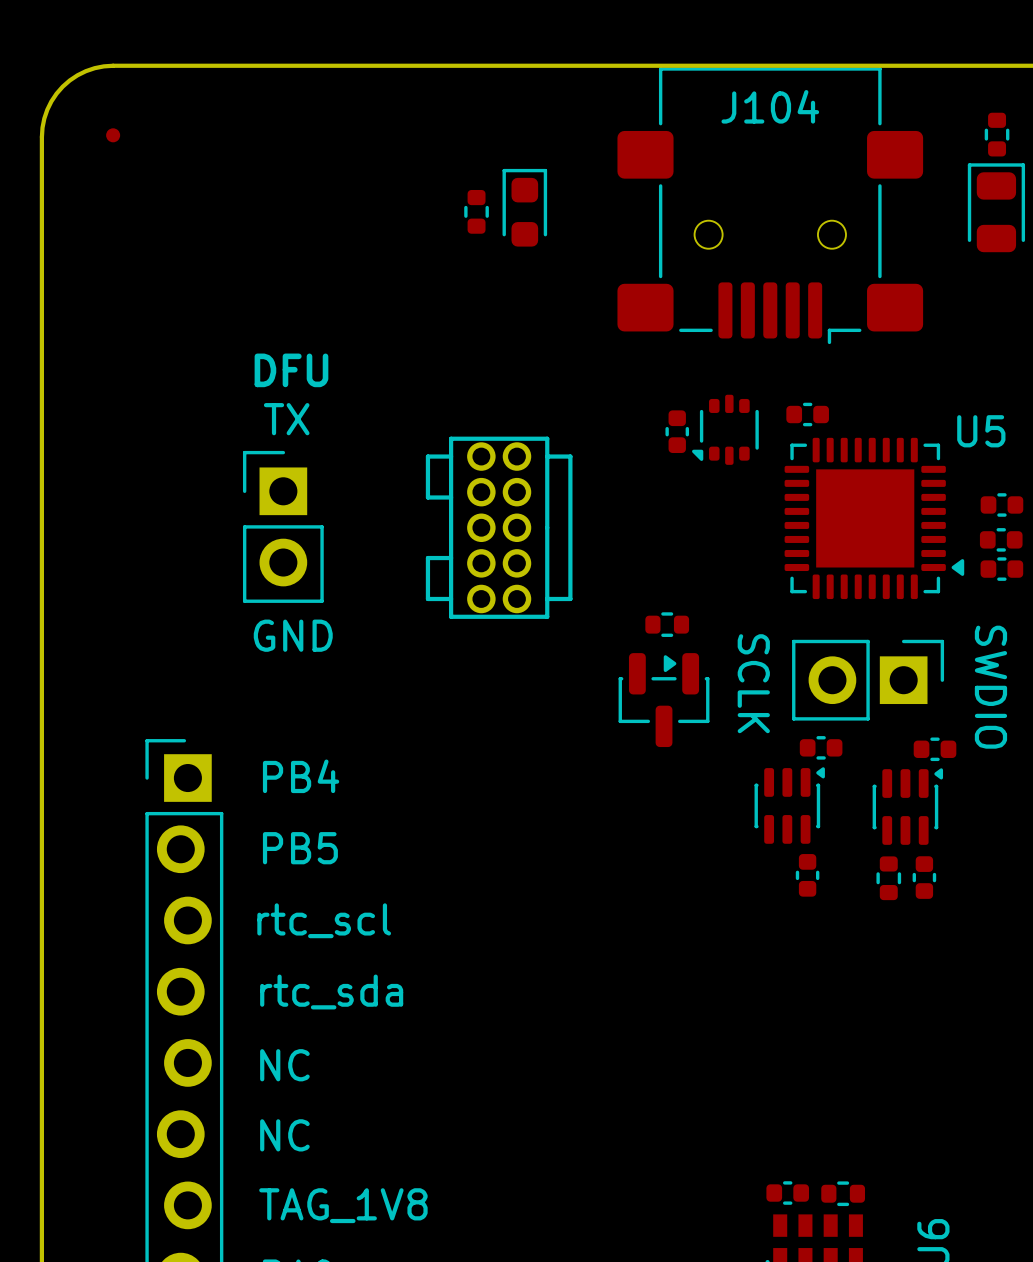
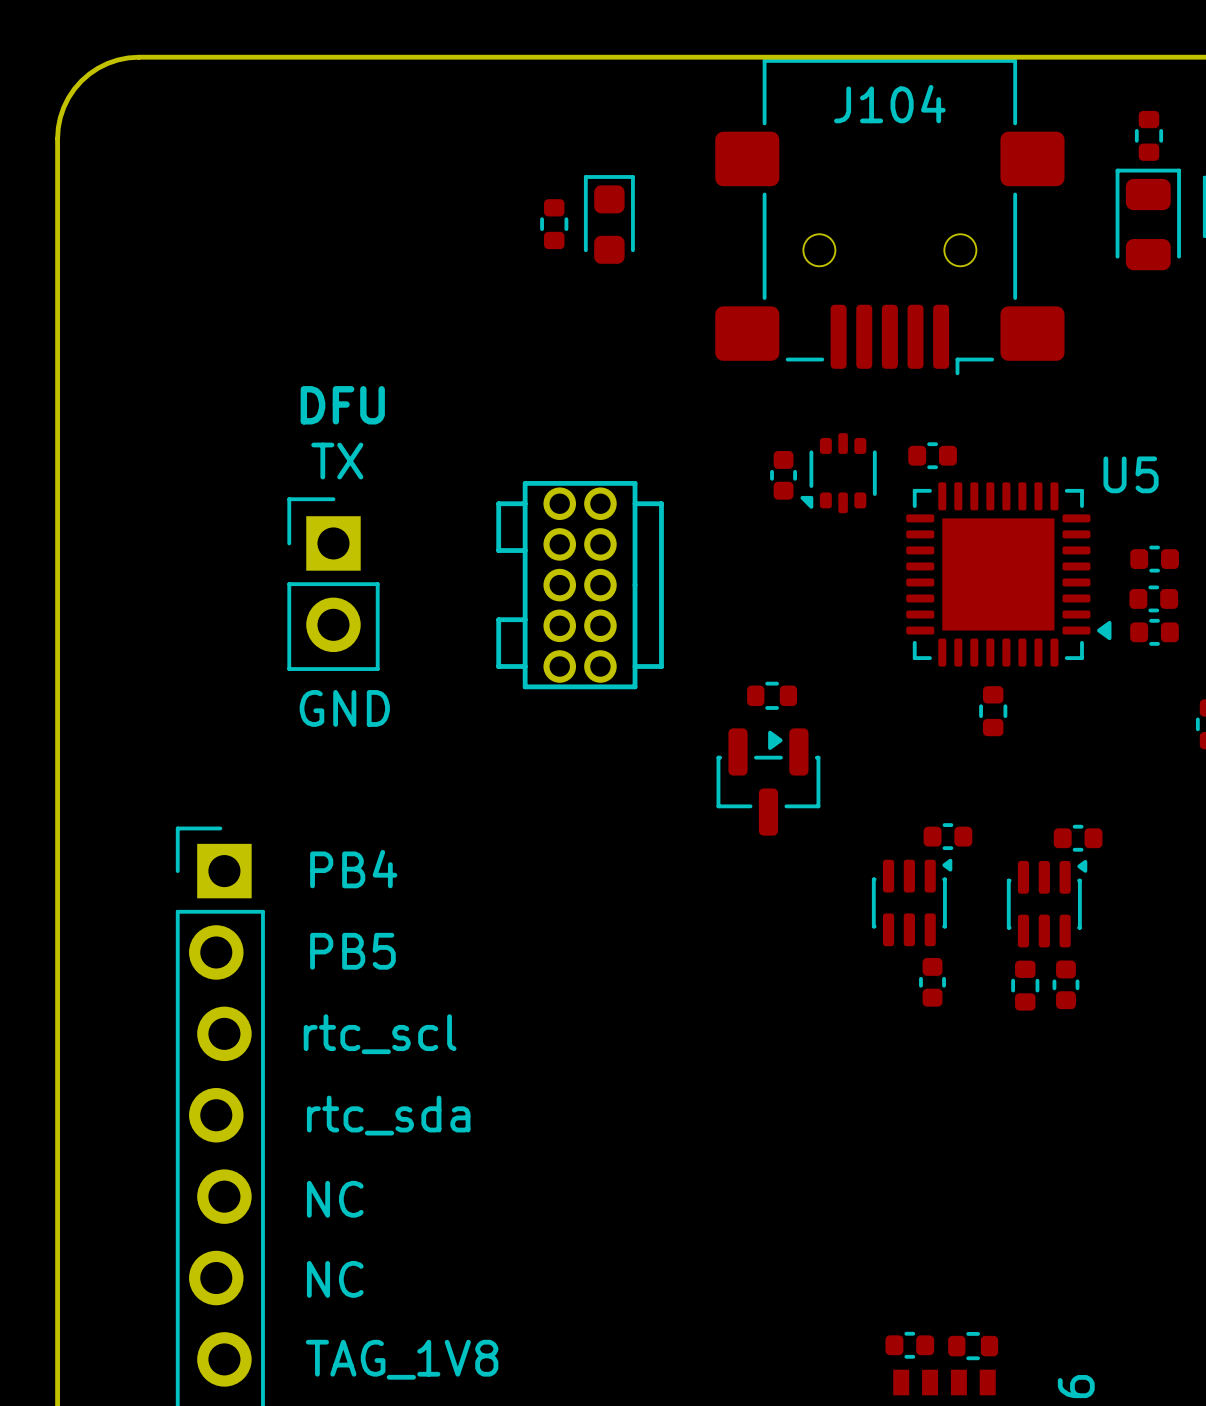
part: (113, 135) -> none
part: none -> (993, 711)
part: (868, 680) -> none
text: SCLK (753, 683) -> none
text: SWDIO (990, 687) -> none

